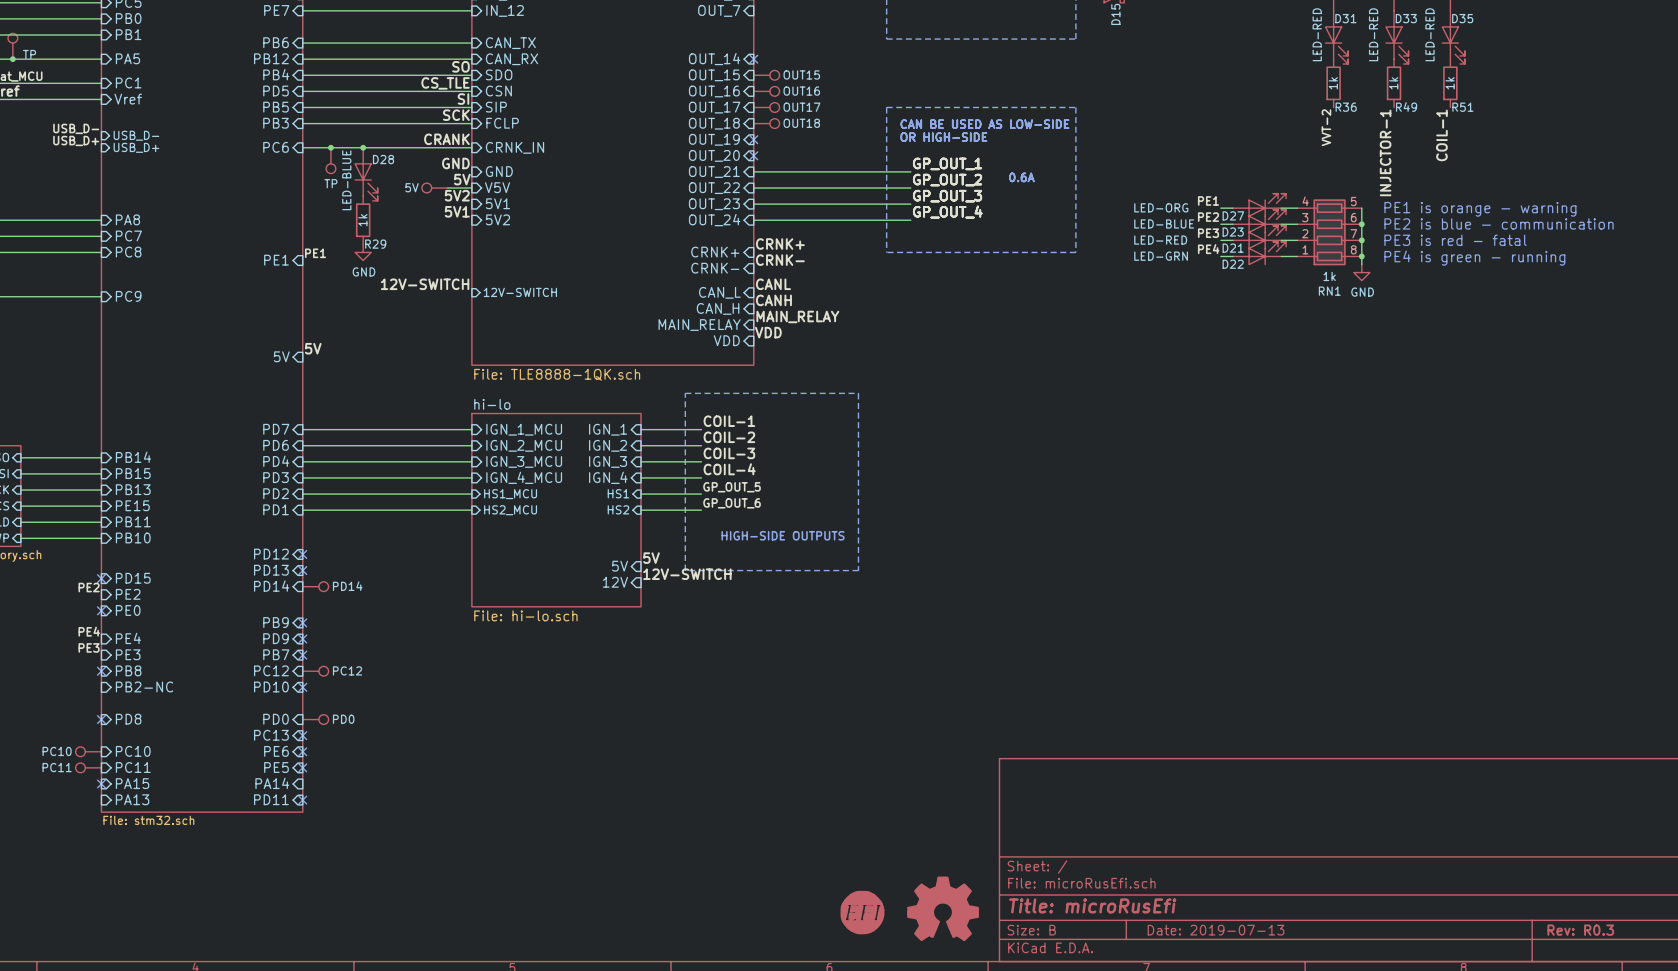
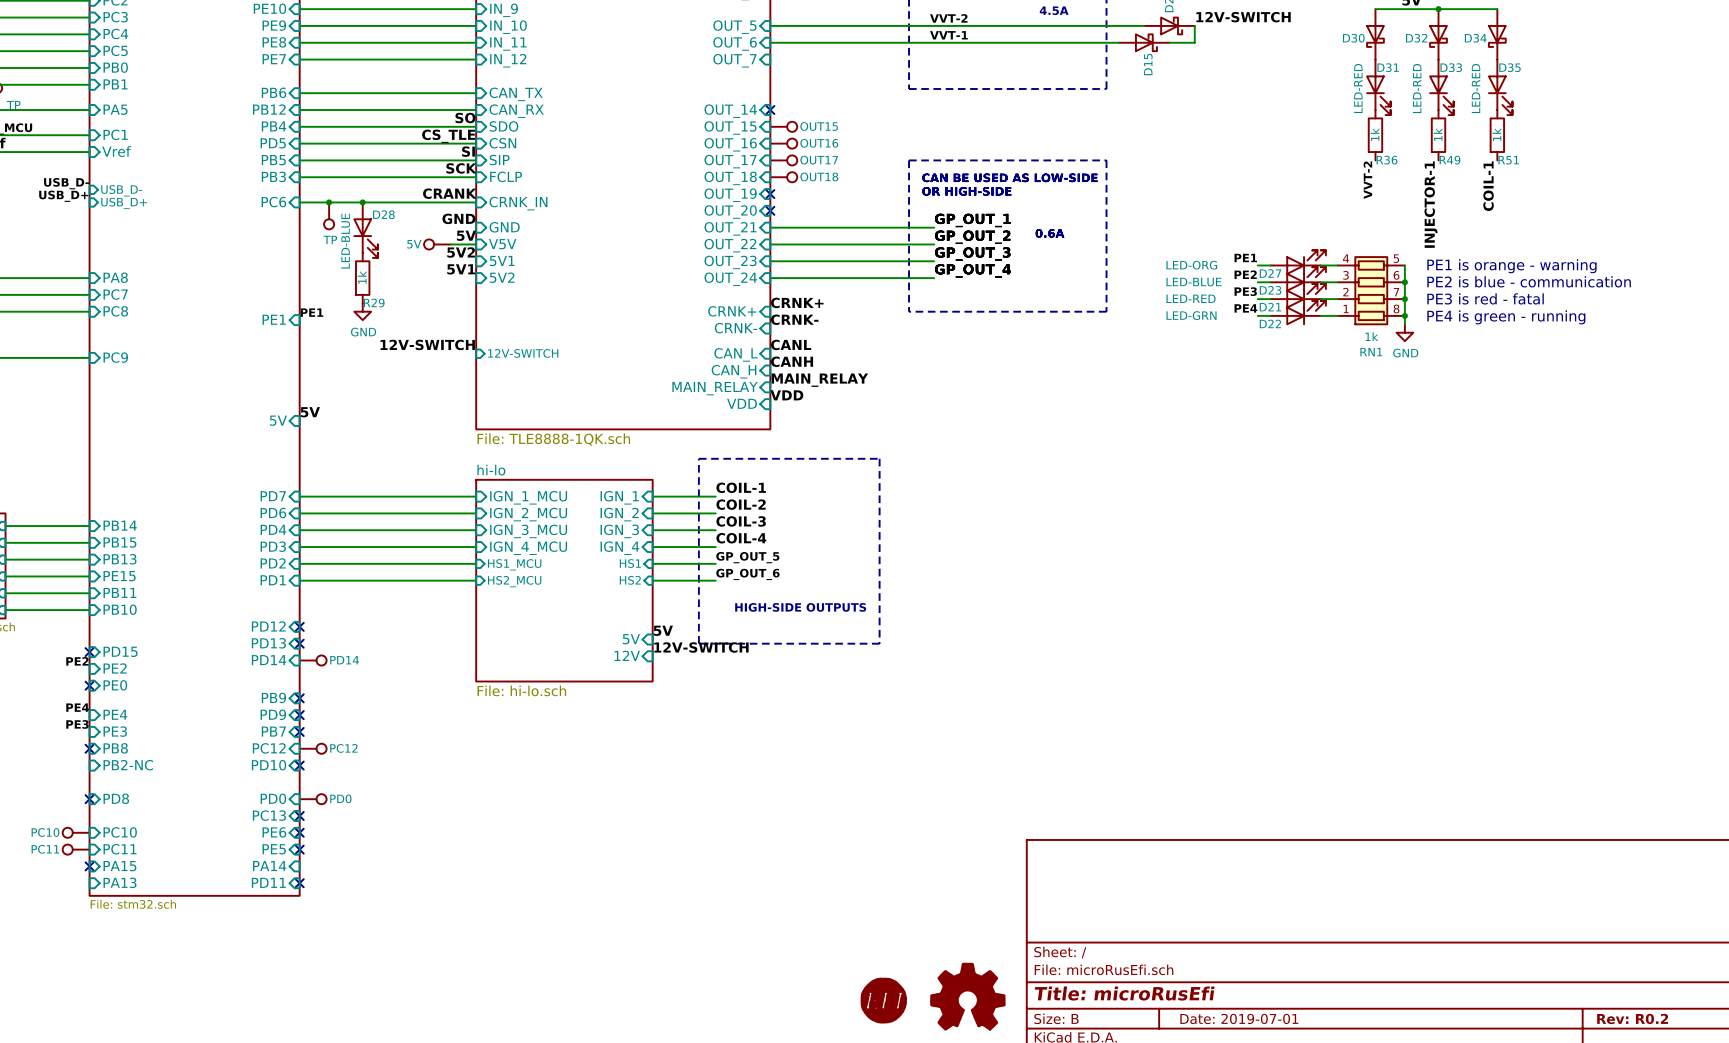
title block: Date: 2019-07-13 (1215, 930) -> Date: 2019-07-01 (1239, 1018)
title block: Rev: R0.3 (1580, 930) -> Rev: R0.2 (1632, 1018)

